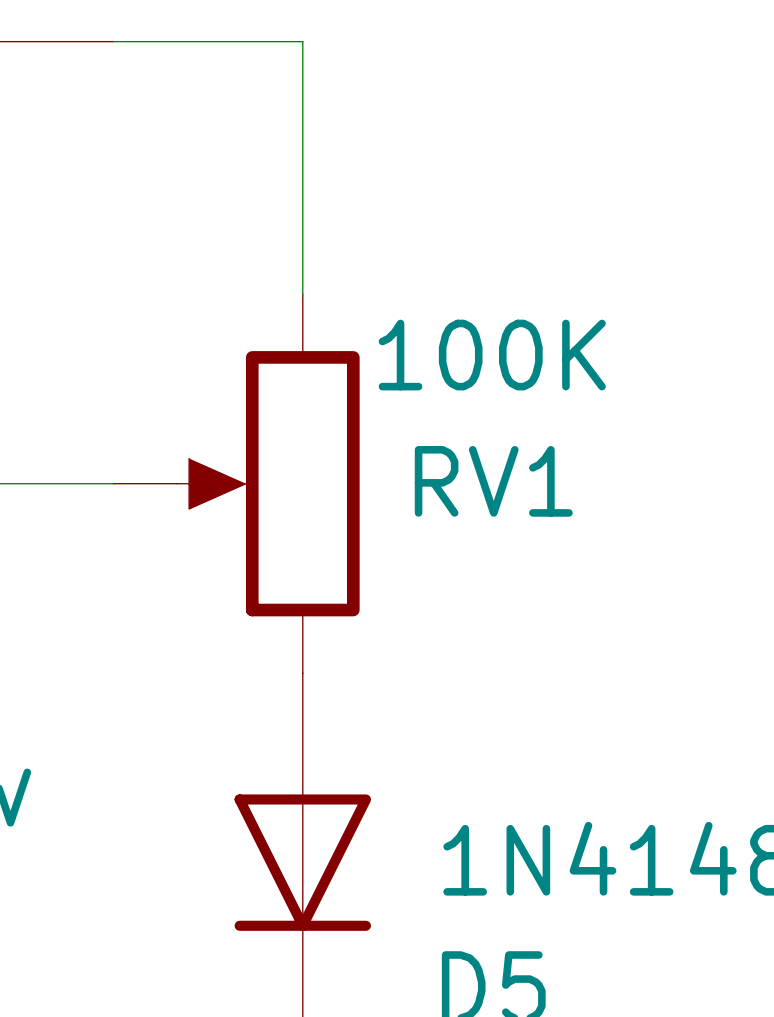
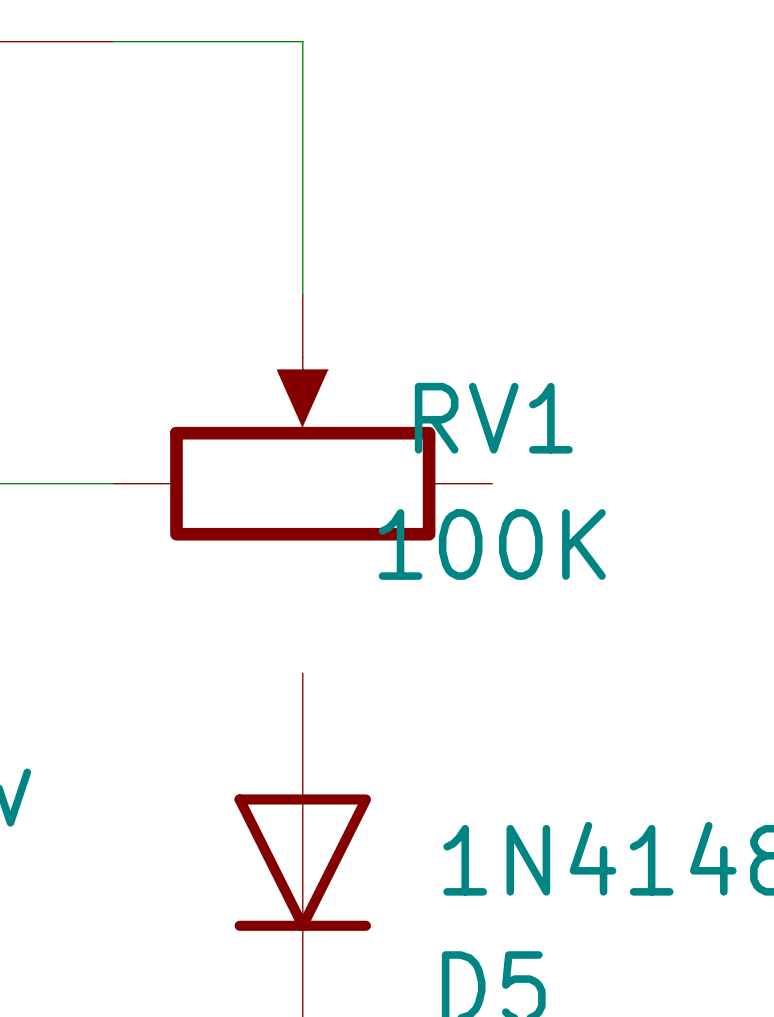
RV1 value position: 100K (492, 355) -> 100K (492, 544)
RV1 rotation: 0° (268, 483) -> 90° clockwise (302, 448)

